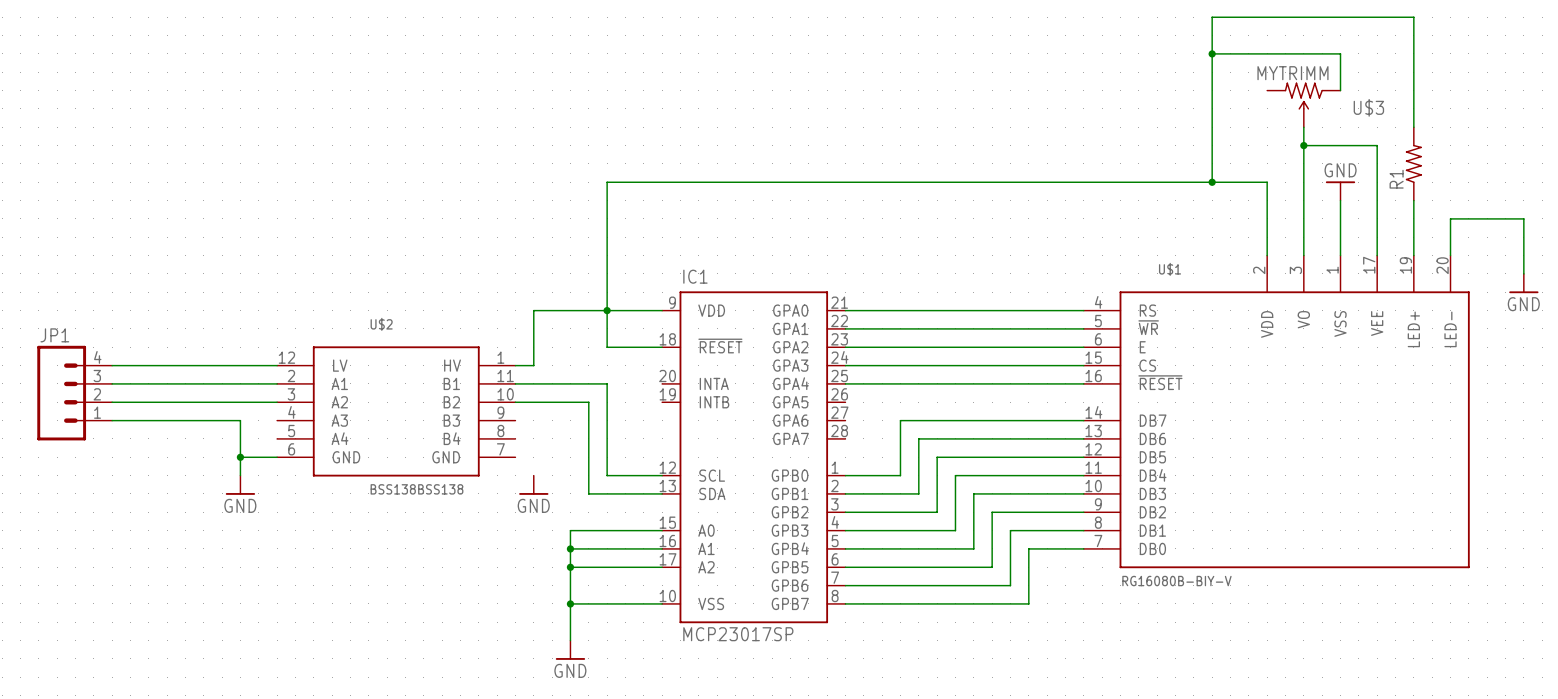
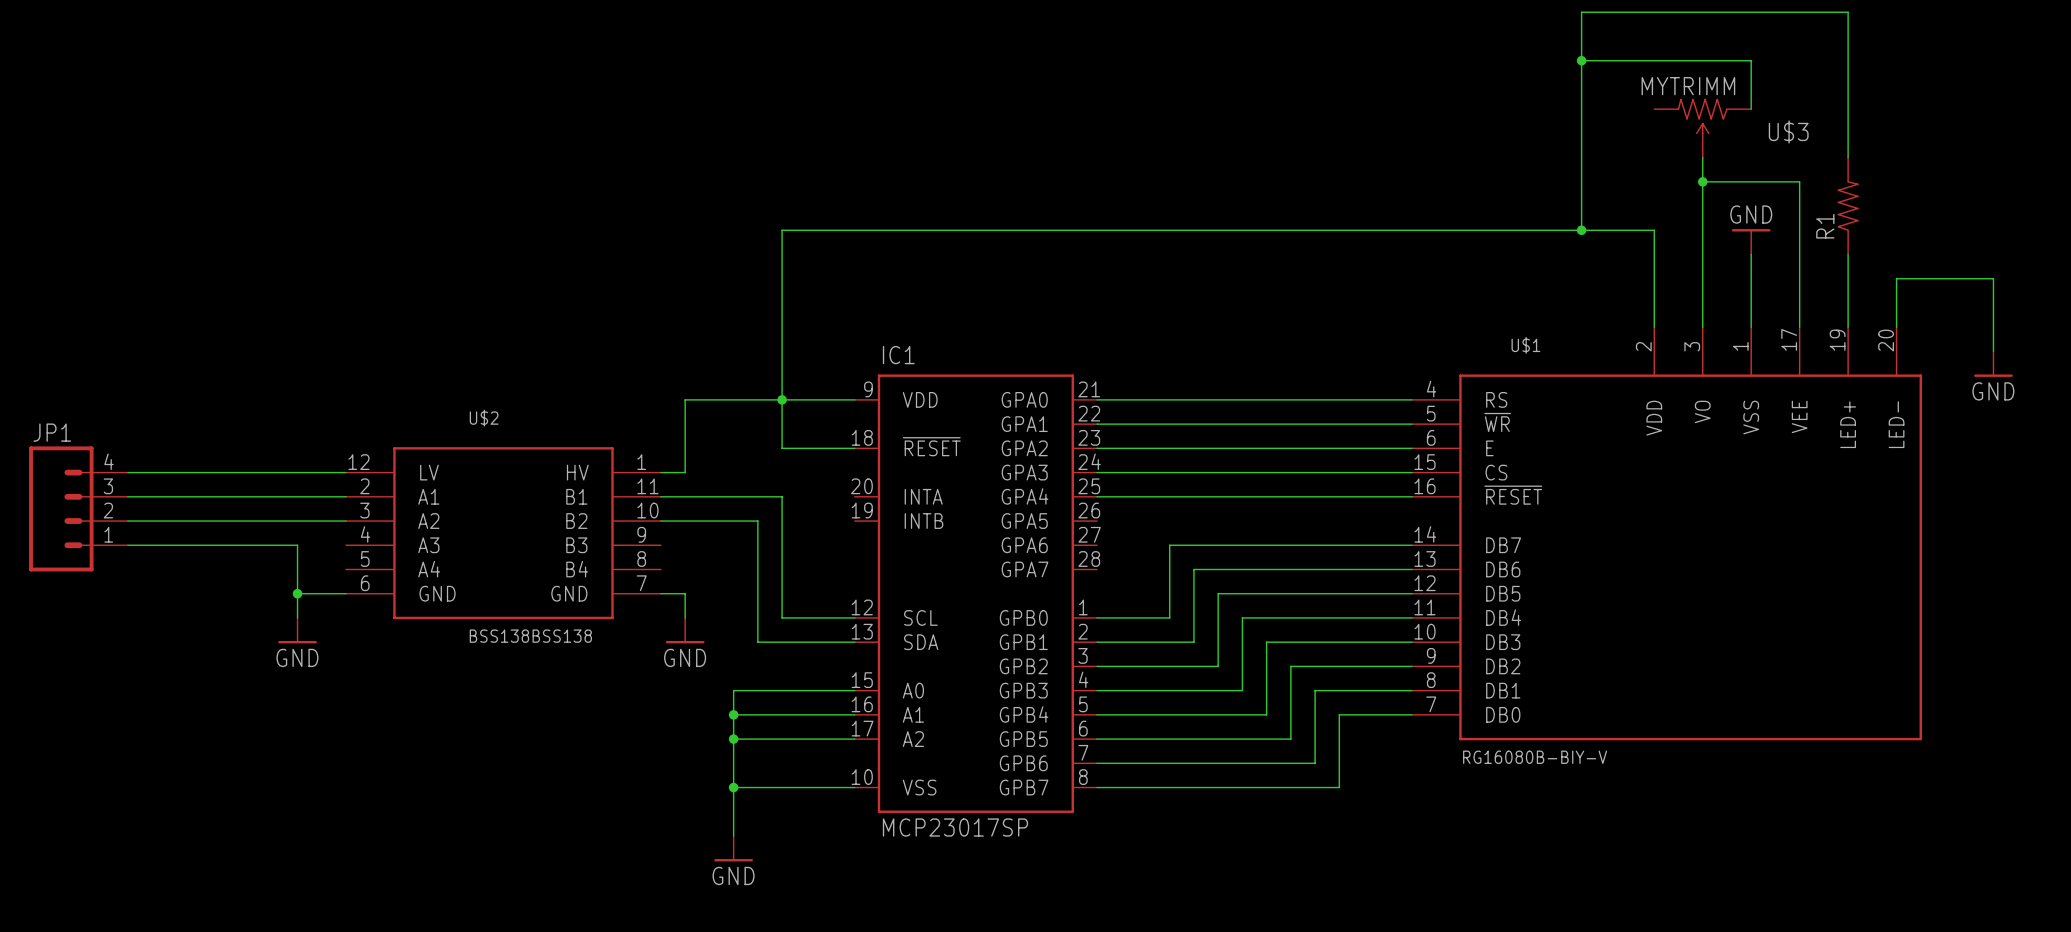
wire: none -> (660, 593) (685, 593) (685, 617)

